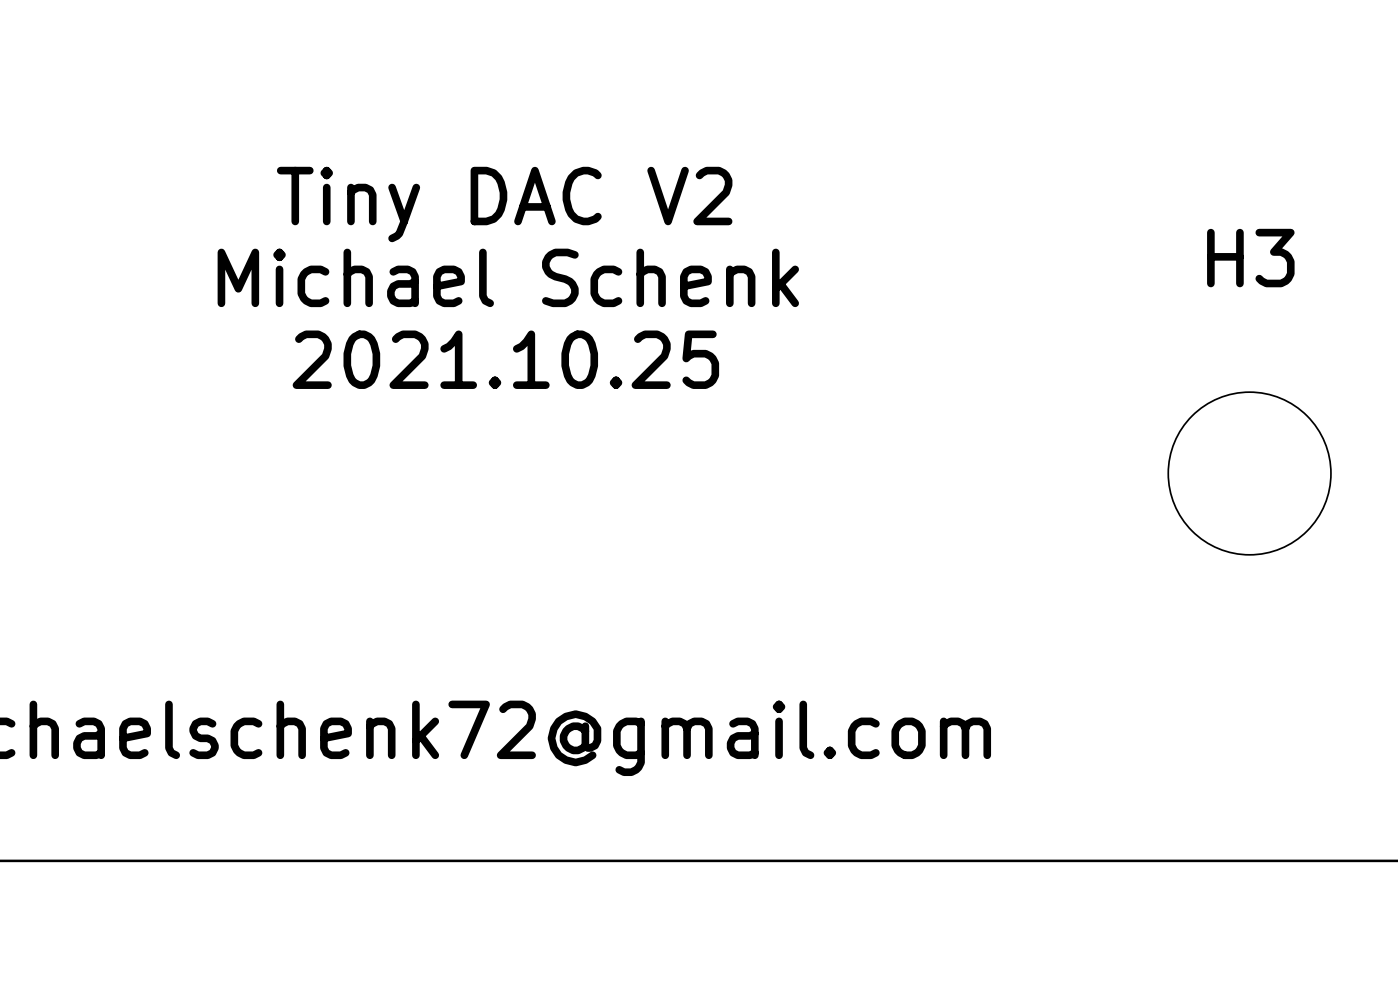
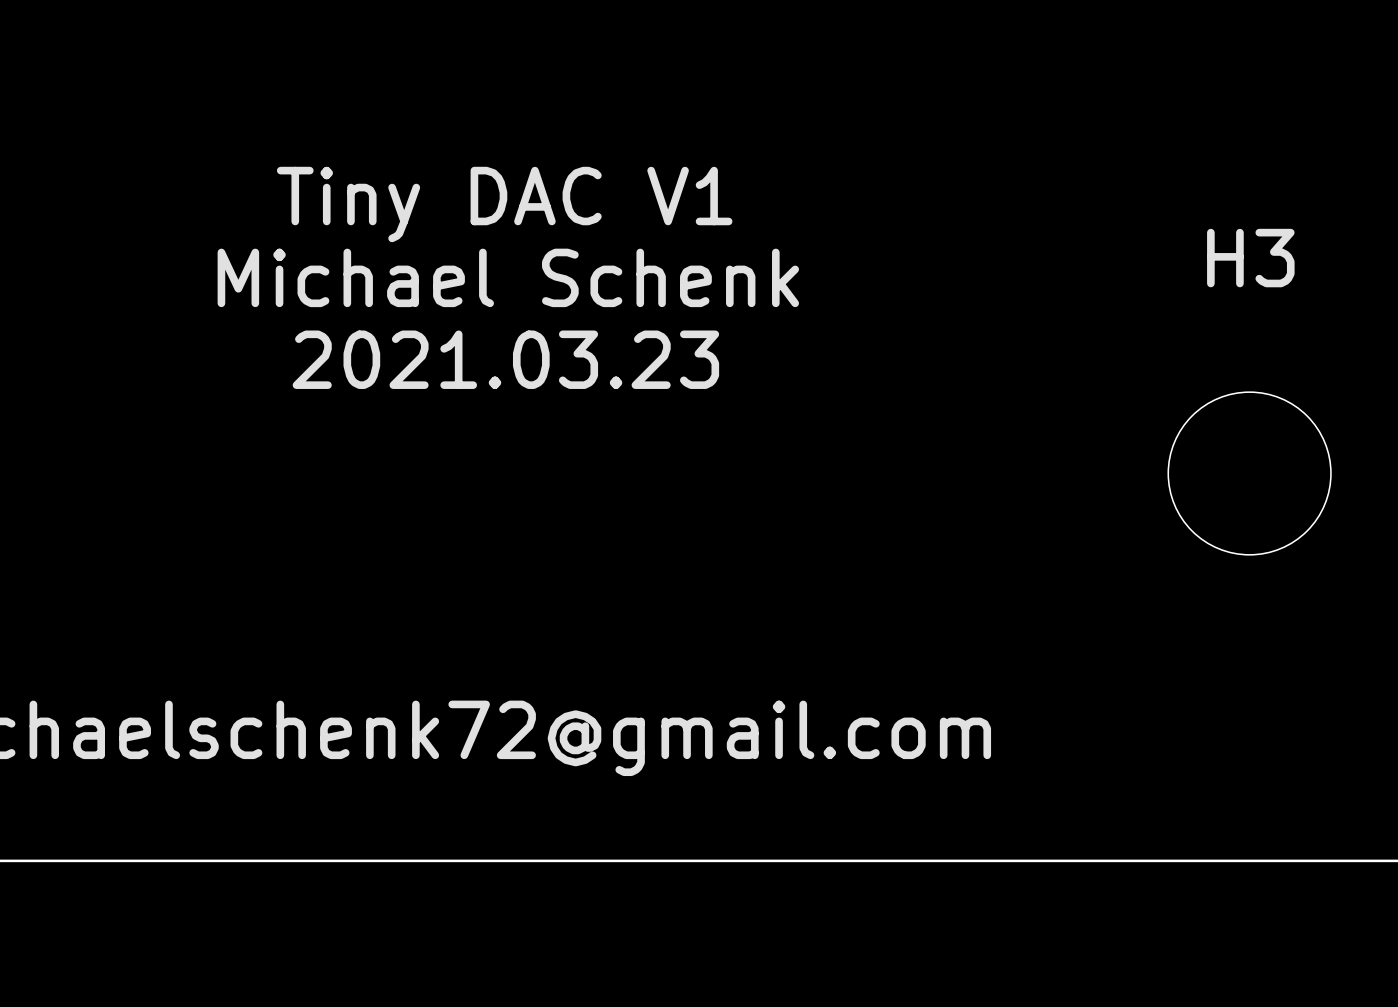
text: Tiny DAC V2 (504, 204) -> Tiny DAC V1 (504, 204)
text: 2021.10.25 (505, 359) -> 2021.03.23 (505, 359)

